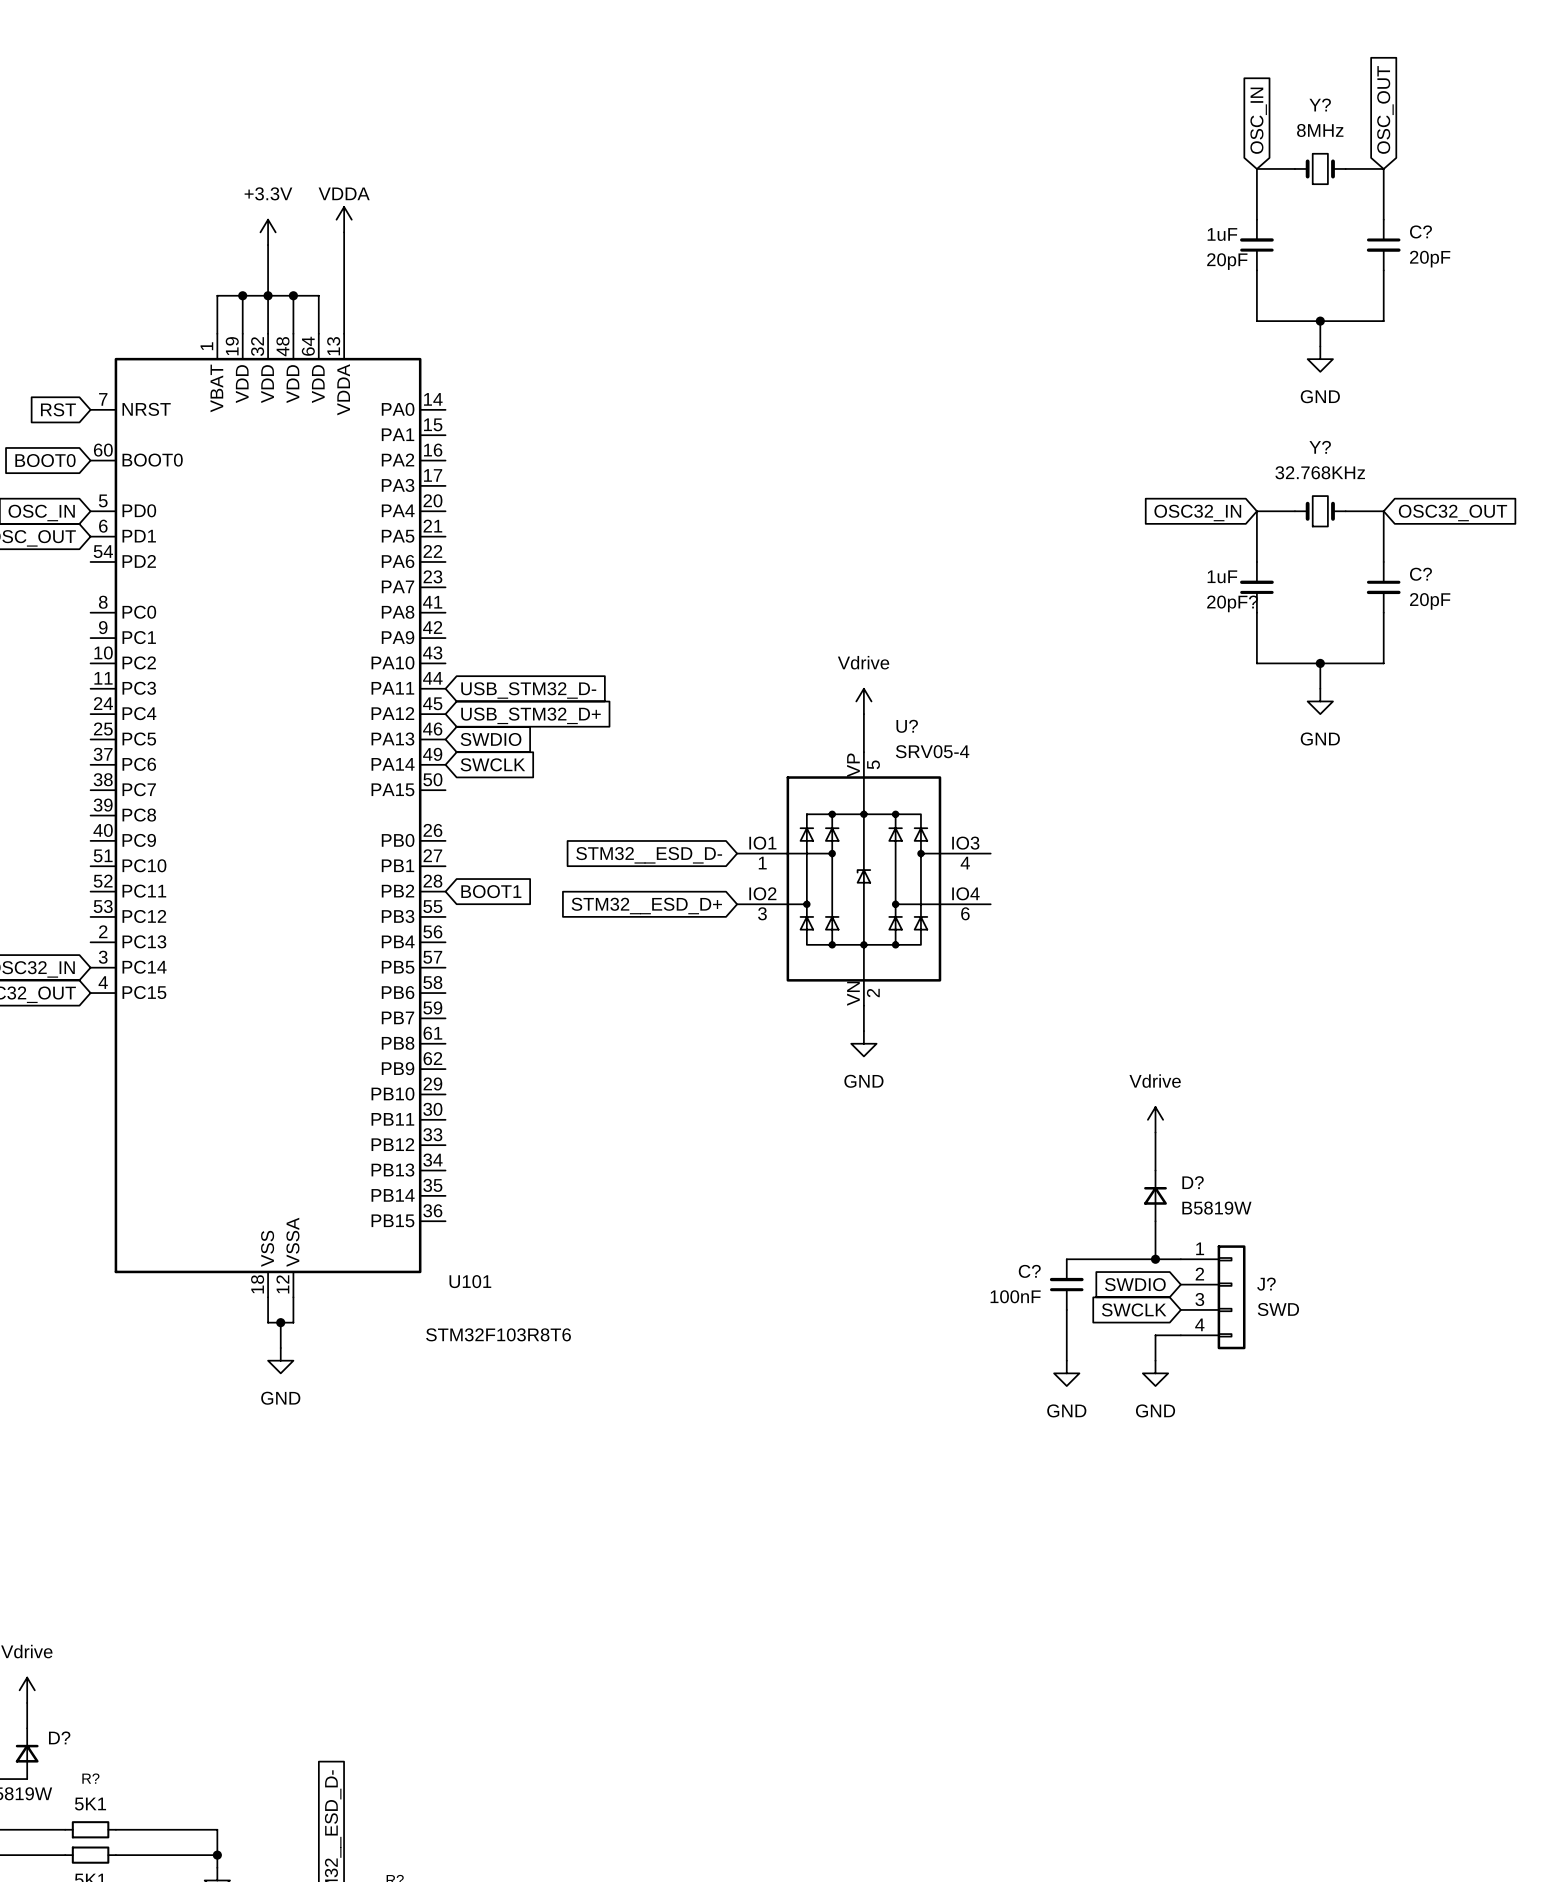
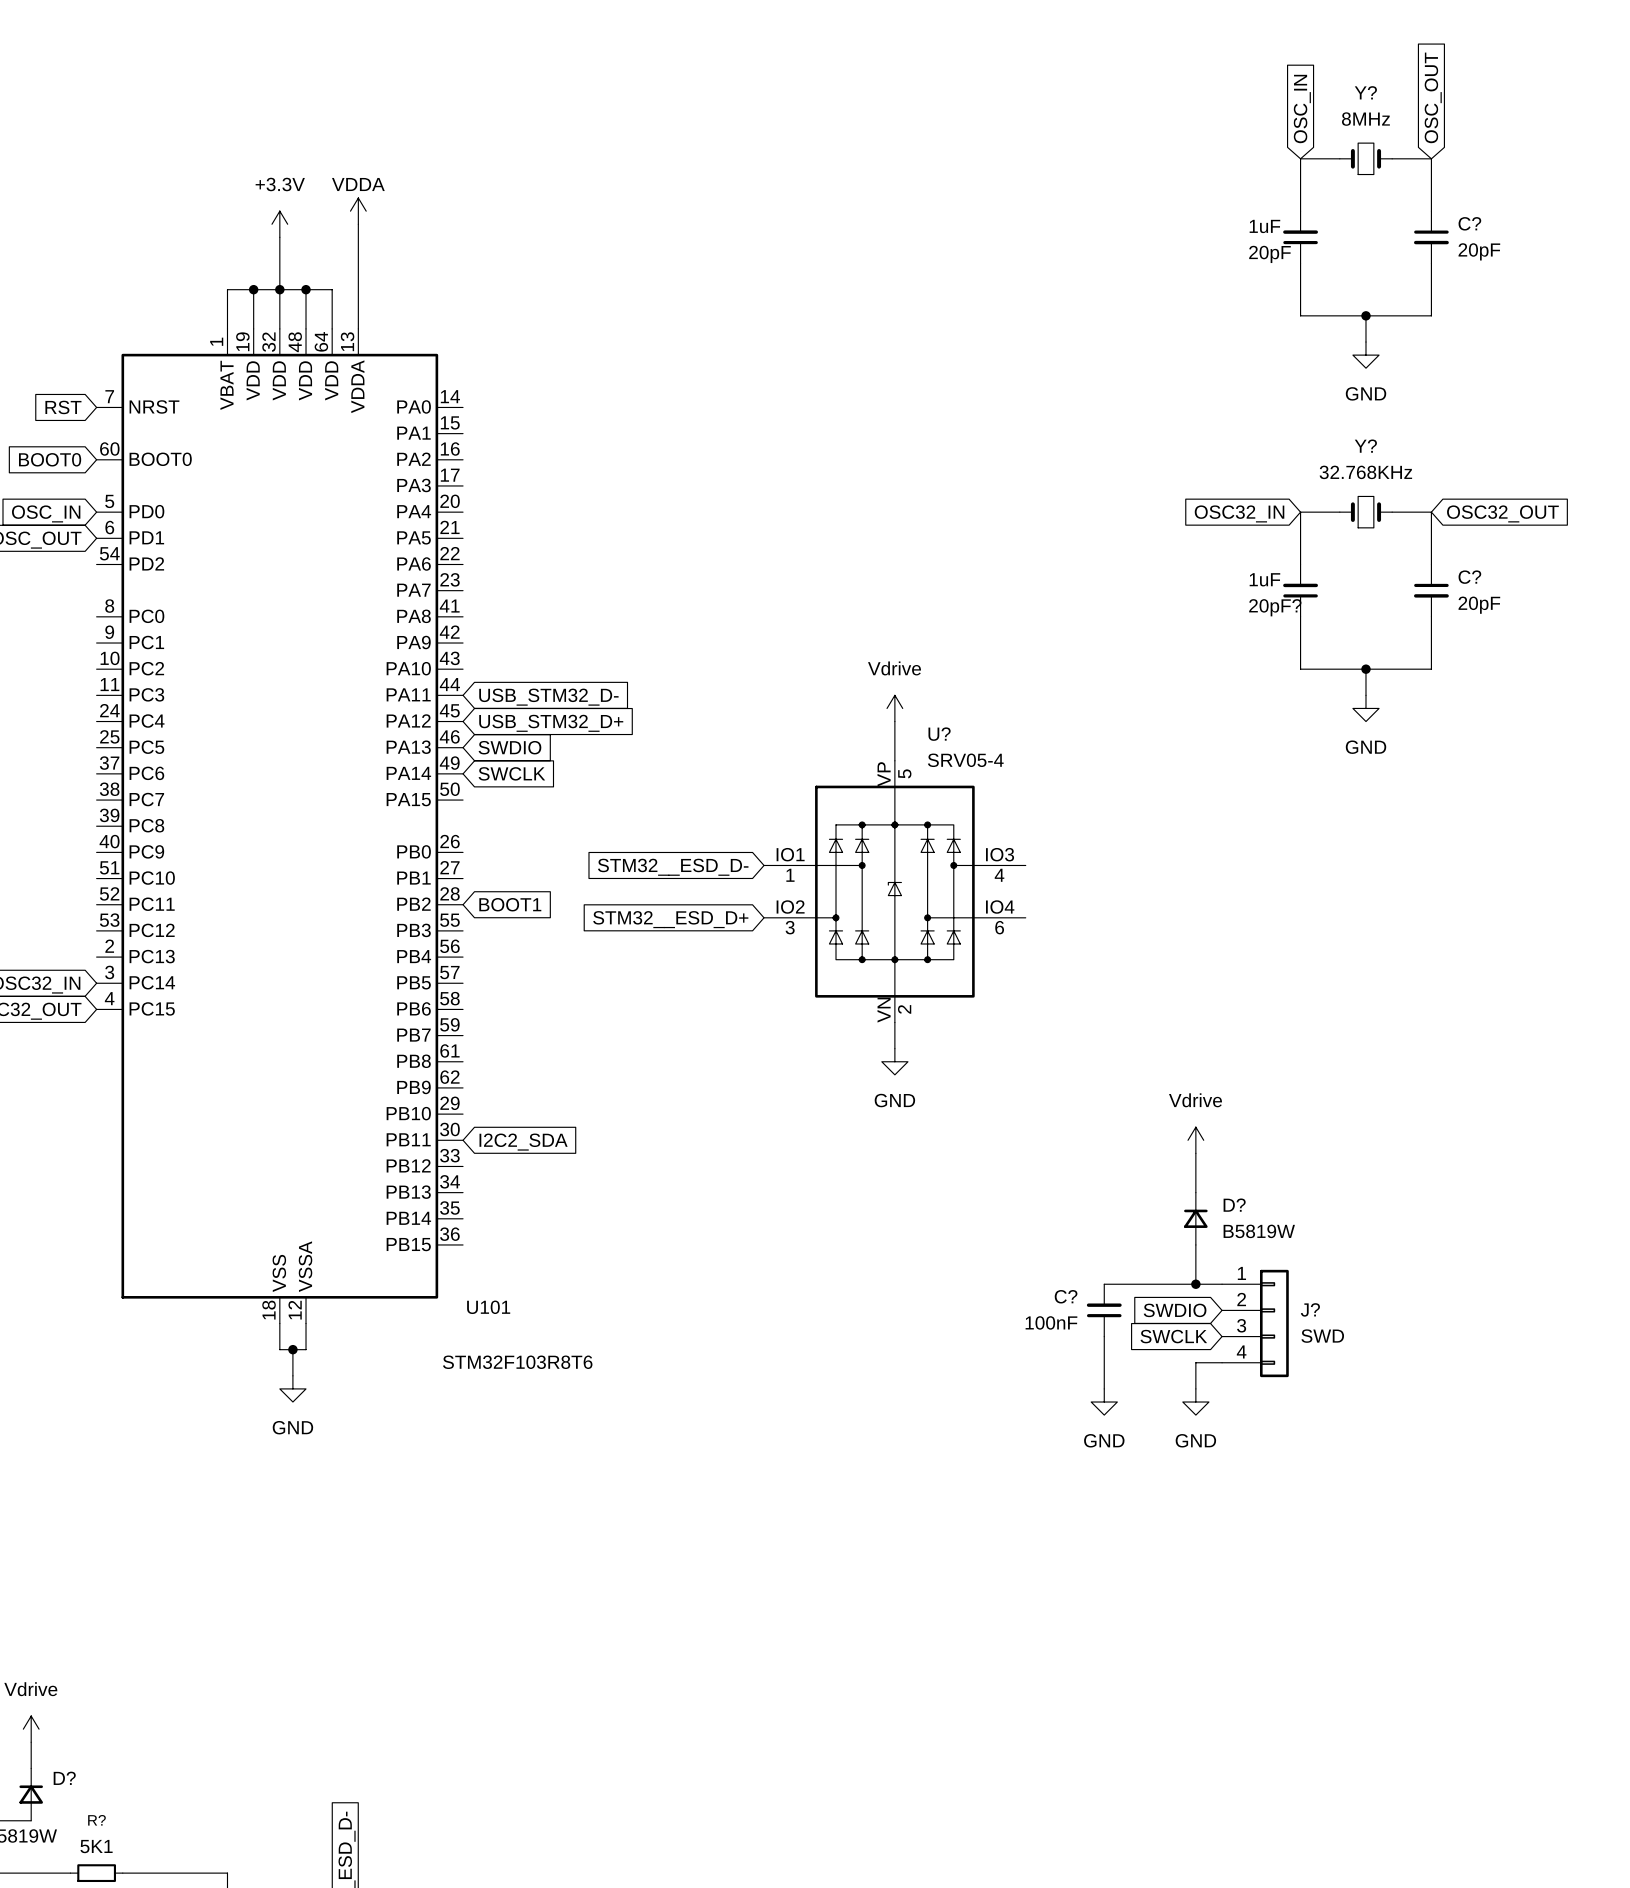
global label: none -> I2C2_SDA (523, 1142)

